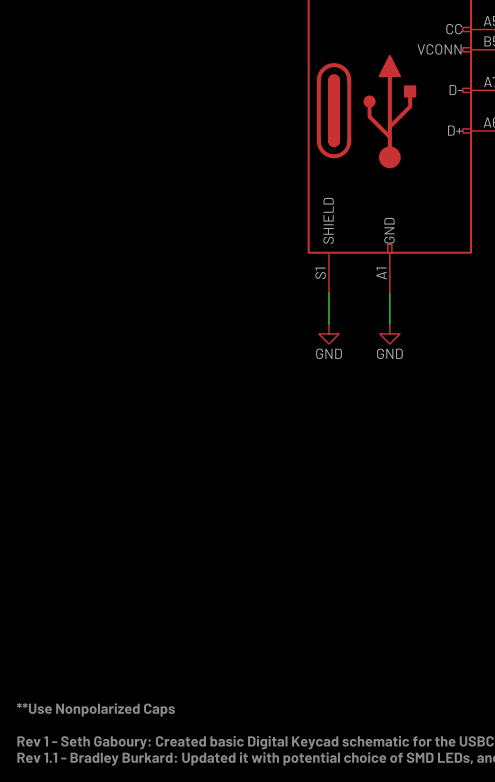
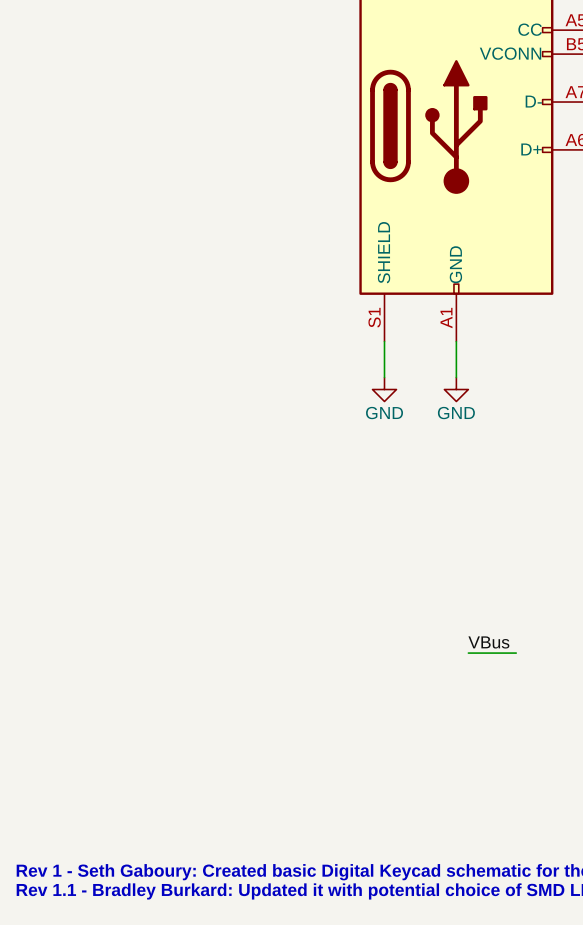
label: none -> VBus (488, 642)
wire: none -> (468, 653) (516, 653)
text: **Use Nonpolarized Caps (95, 709) -> none

